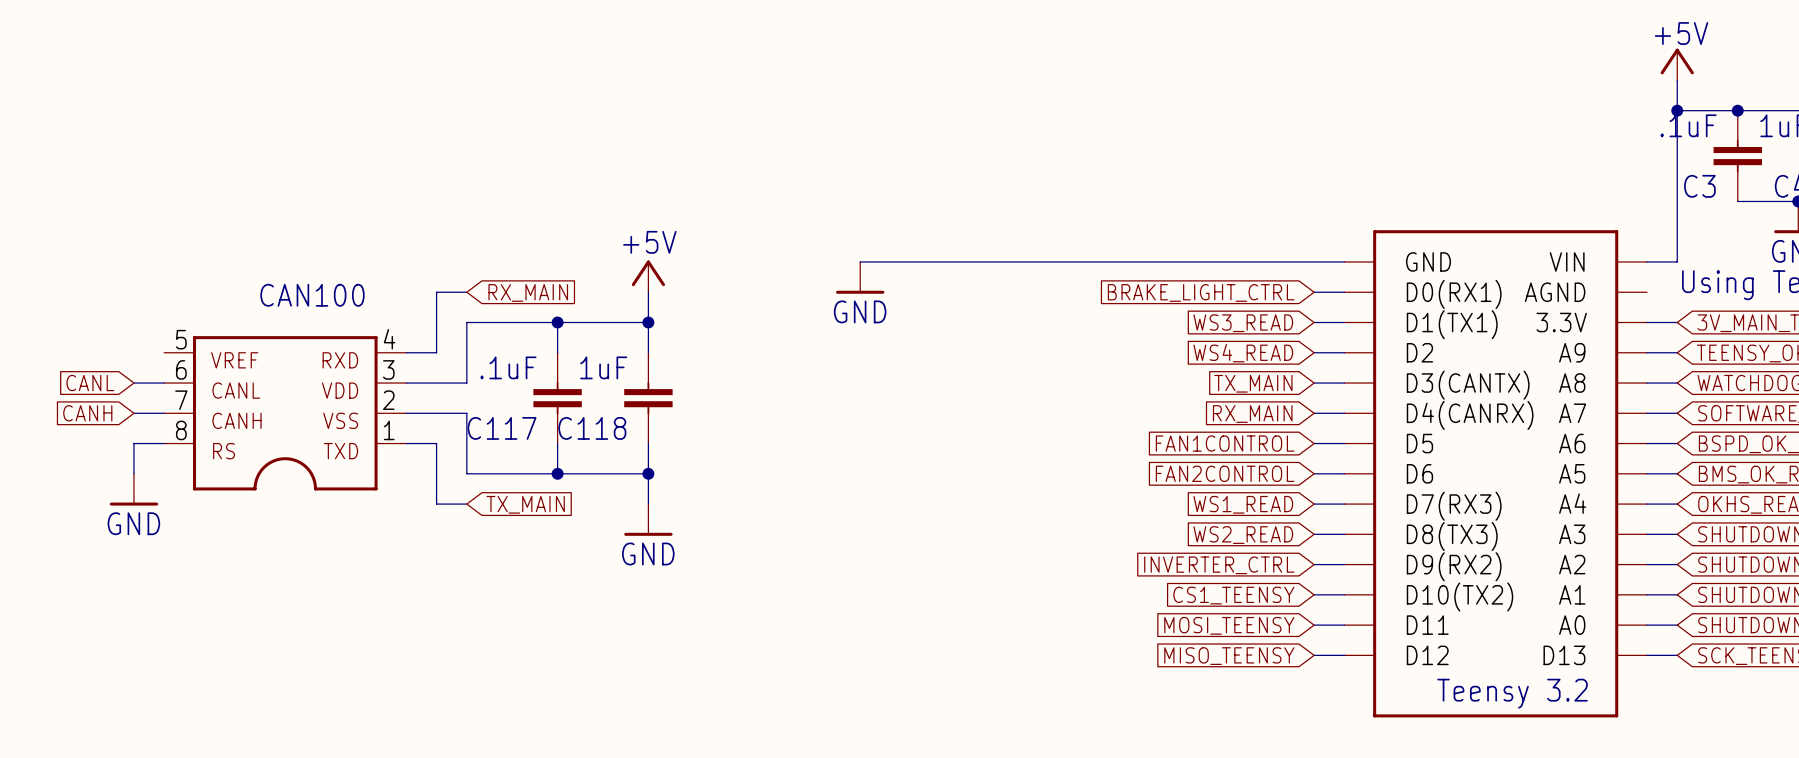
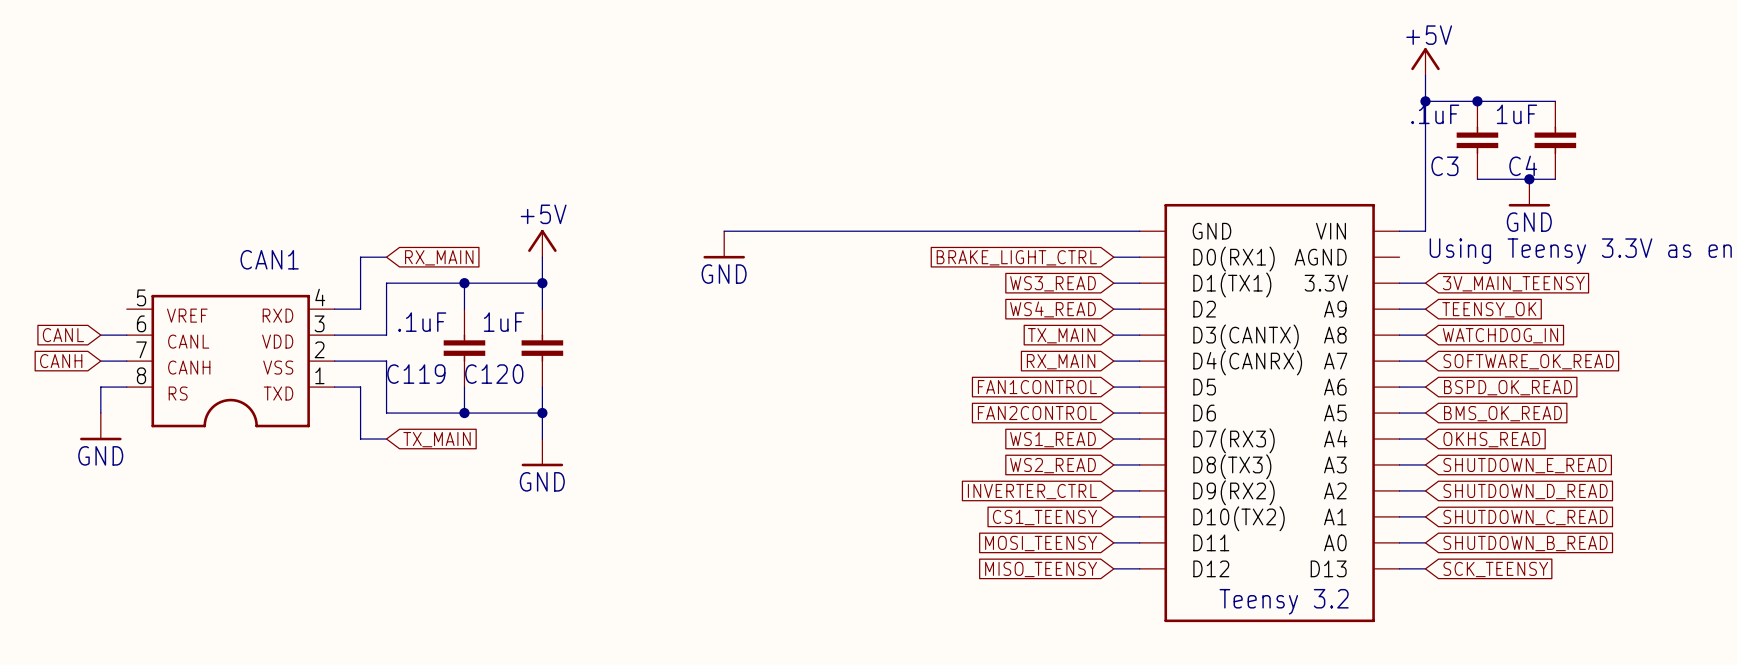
CAN100 name: CAN100 (312, 295) -> CAN1 (269, 259)
C117 name: C117 (502, 428) -> C119 (416, 374)
C118 name: C118 (592, 428) -> C120 (494, 374)

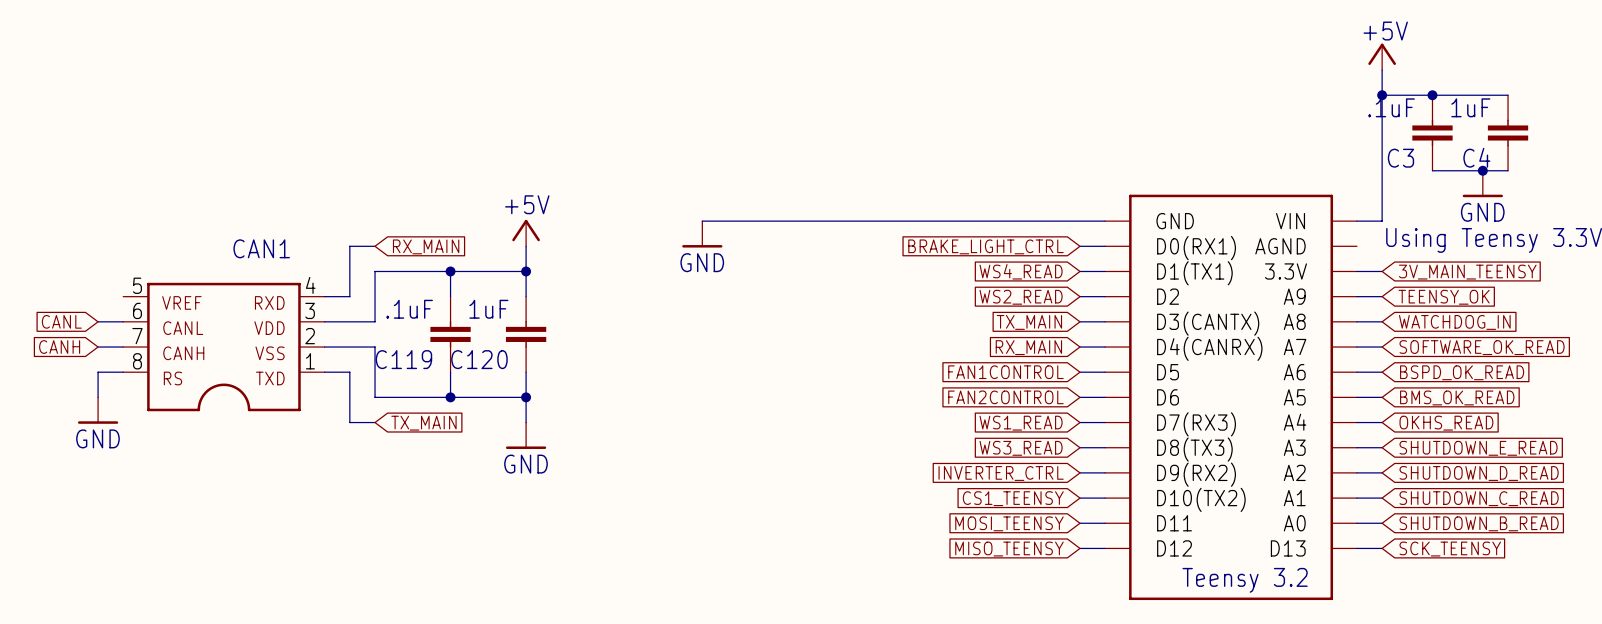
global label: WS3_READ (1053, 283) -> WS4_READ (1021, 271)
global label: WS4_READ (1053, 309) -> WS2_READ (1021, 297)
global label: WS2_READ (1053, 465) -> WS3_READ (1021, 448)

